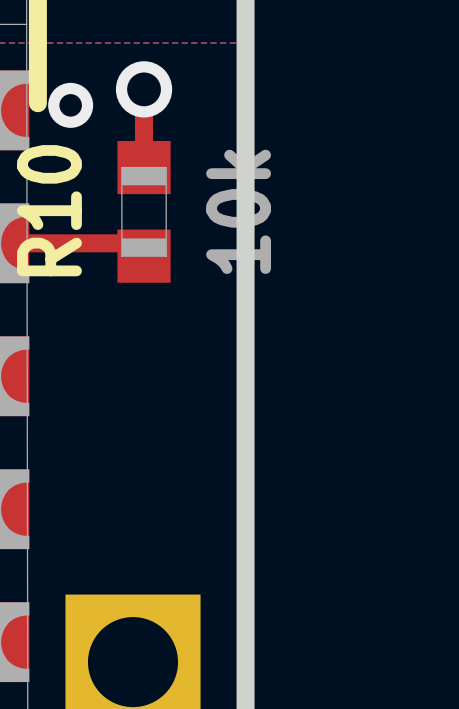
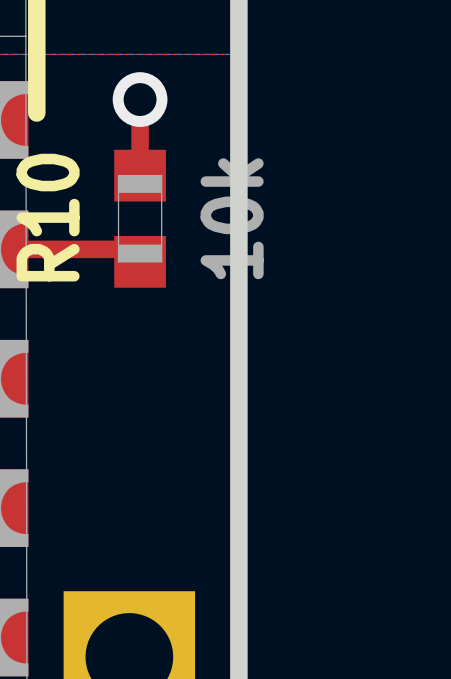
via: (70, 105) -> none

